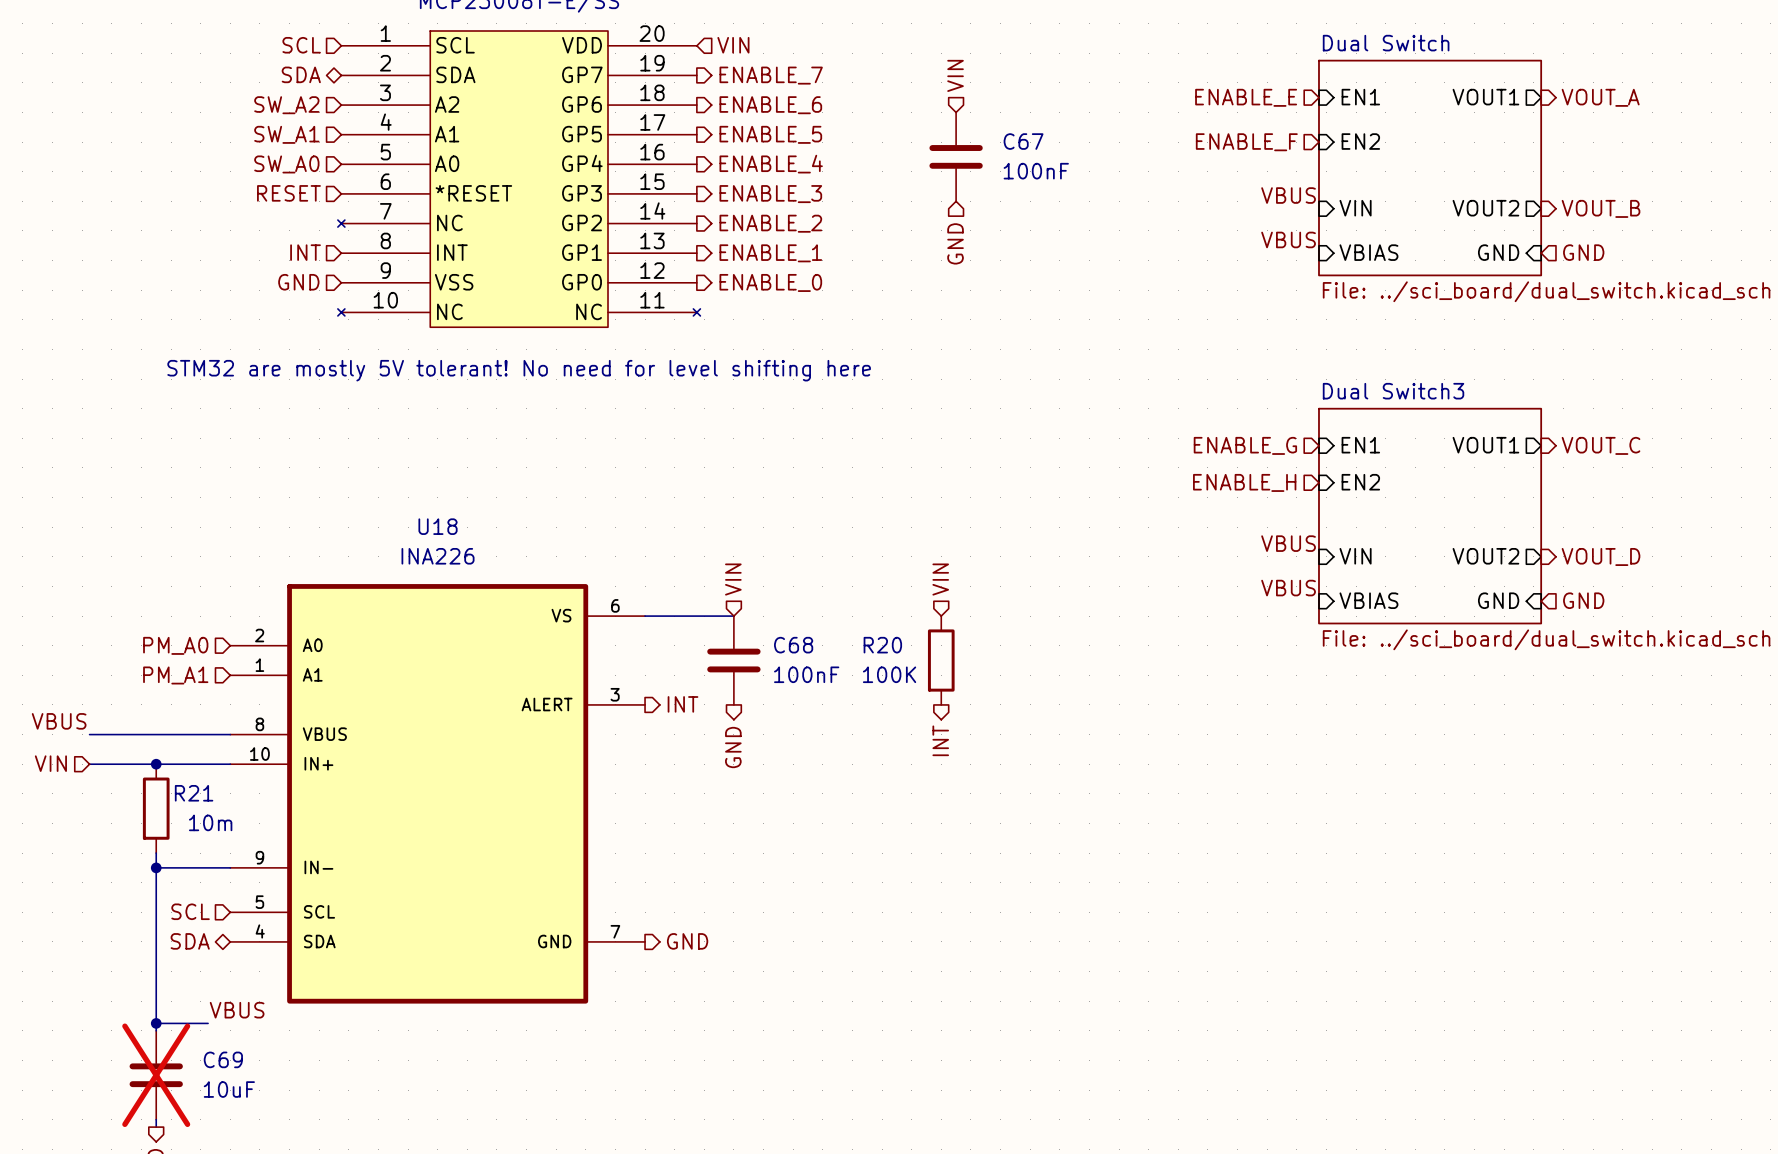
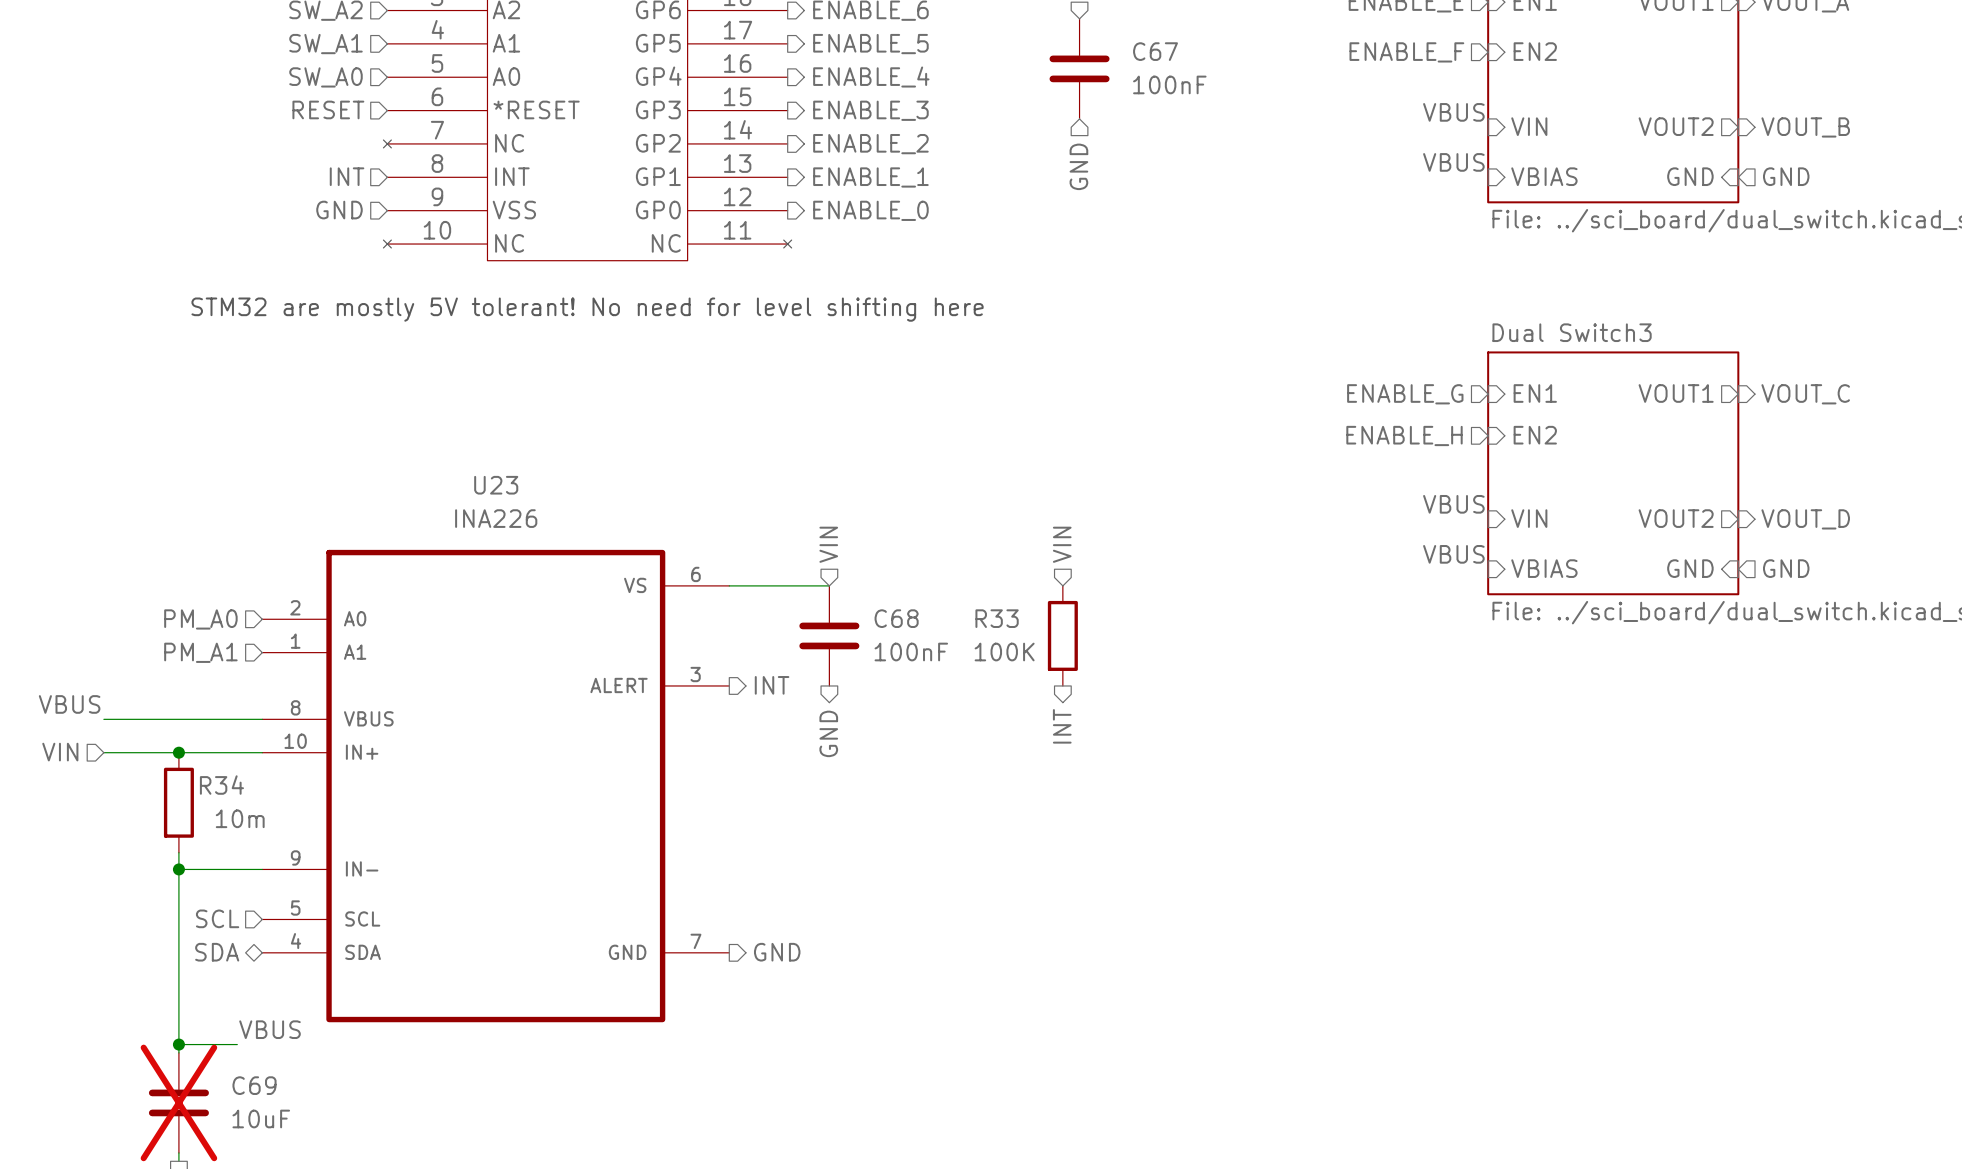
U18 name: U18 (438, 526) -> U23 (496, 485)
R20 name: R20 (882, 645) -> R33 (997, 618)
R21 name: R21 (194, 793) -> R34 (221, 785)

